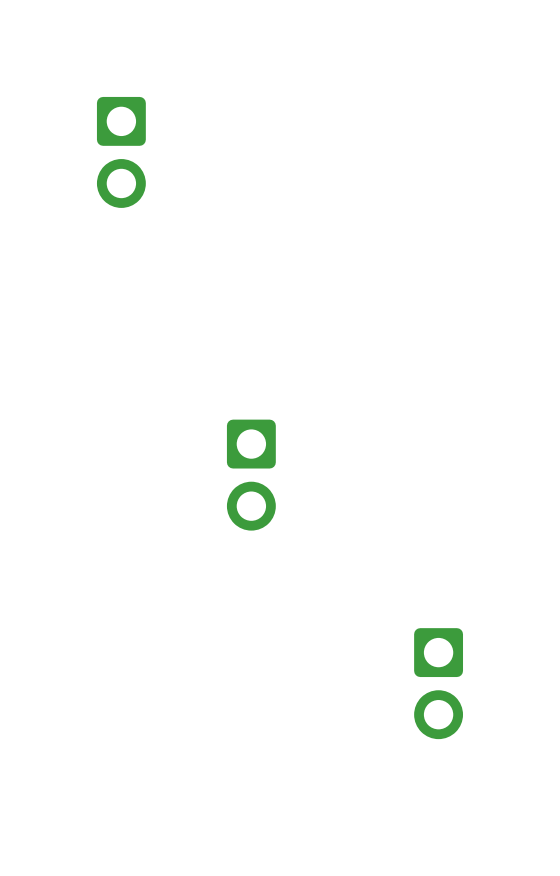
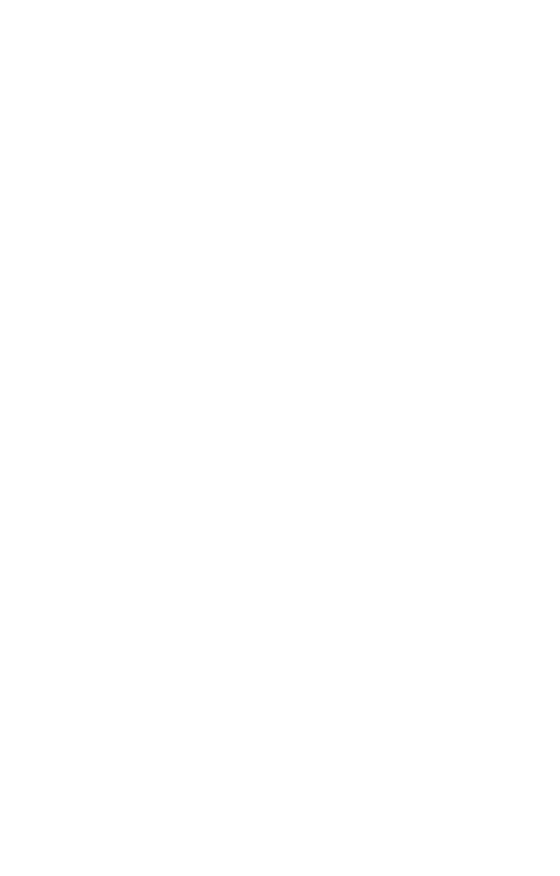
part: (121, 152) -> none
part: (251, 475) -> none
part: (438, 683) -> none

